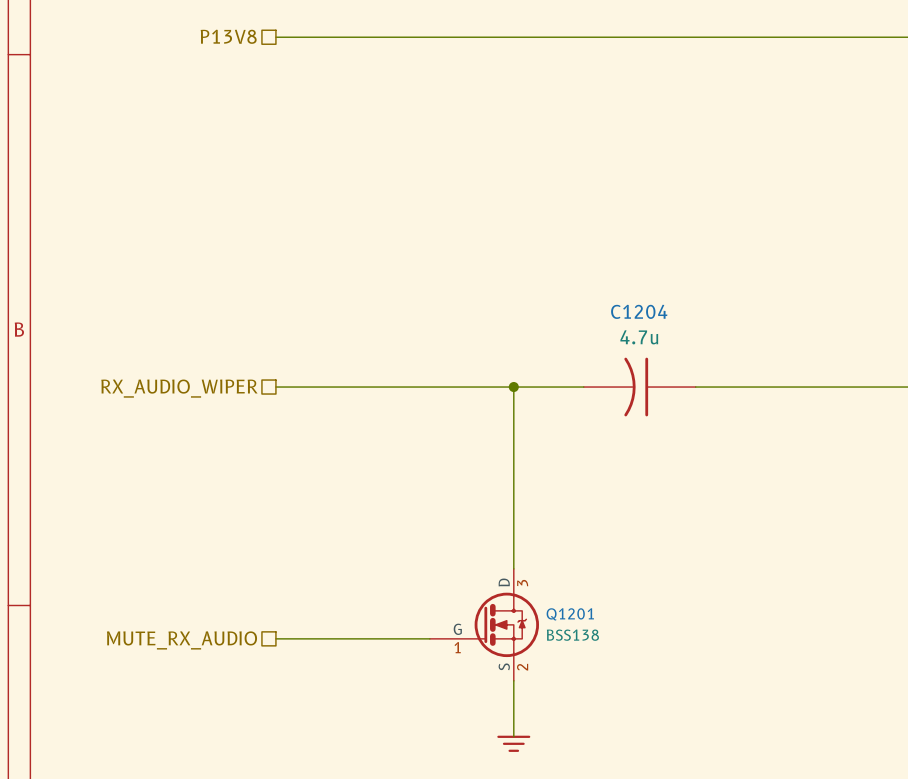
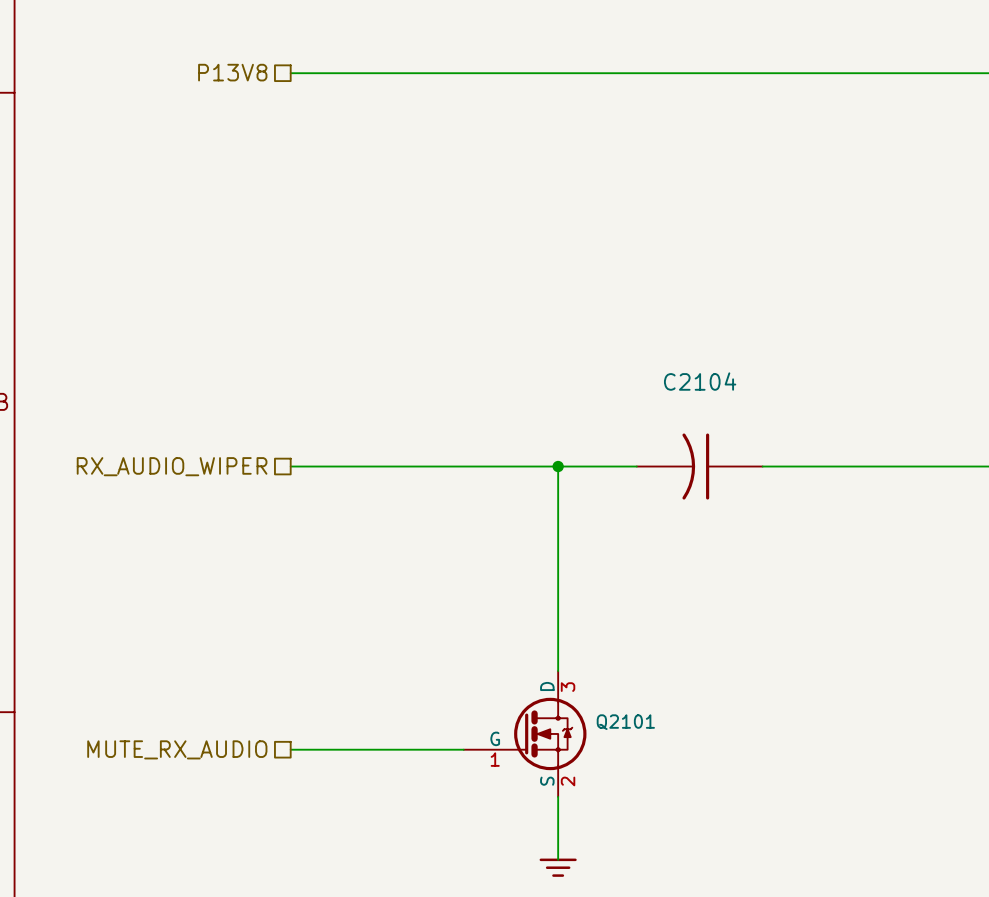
C1204 name: C1204 (639, 311) -> C2104 (700, 381)
C1204 value: 4.7u (639, 337) -> none
Q1201 name: Q1201 (570, 614) -> Q2101 (625, 722)
Q1201 value: BSS138 (572, 635) -> none

